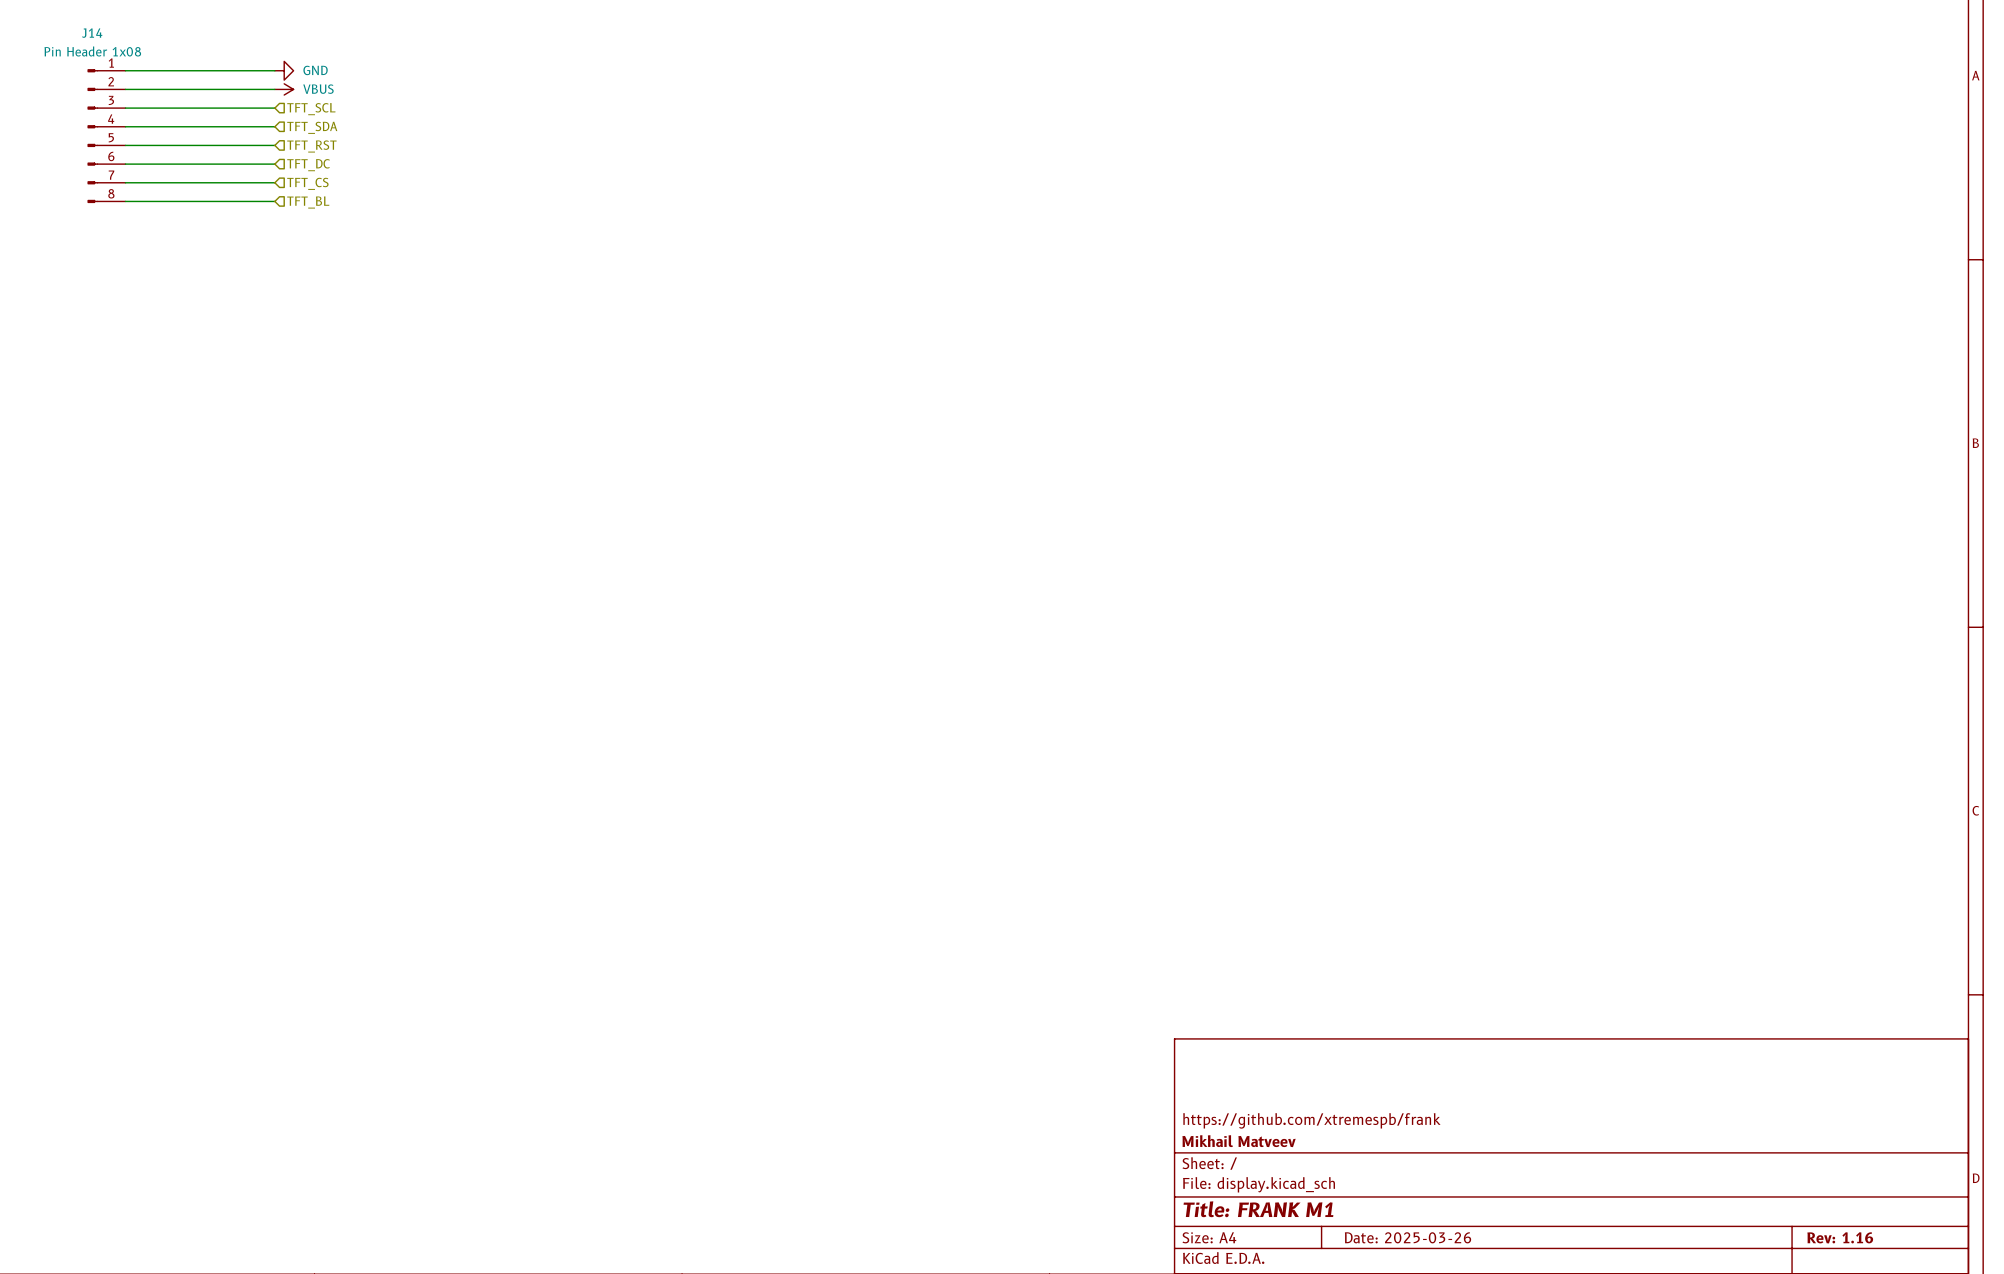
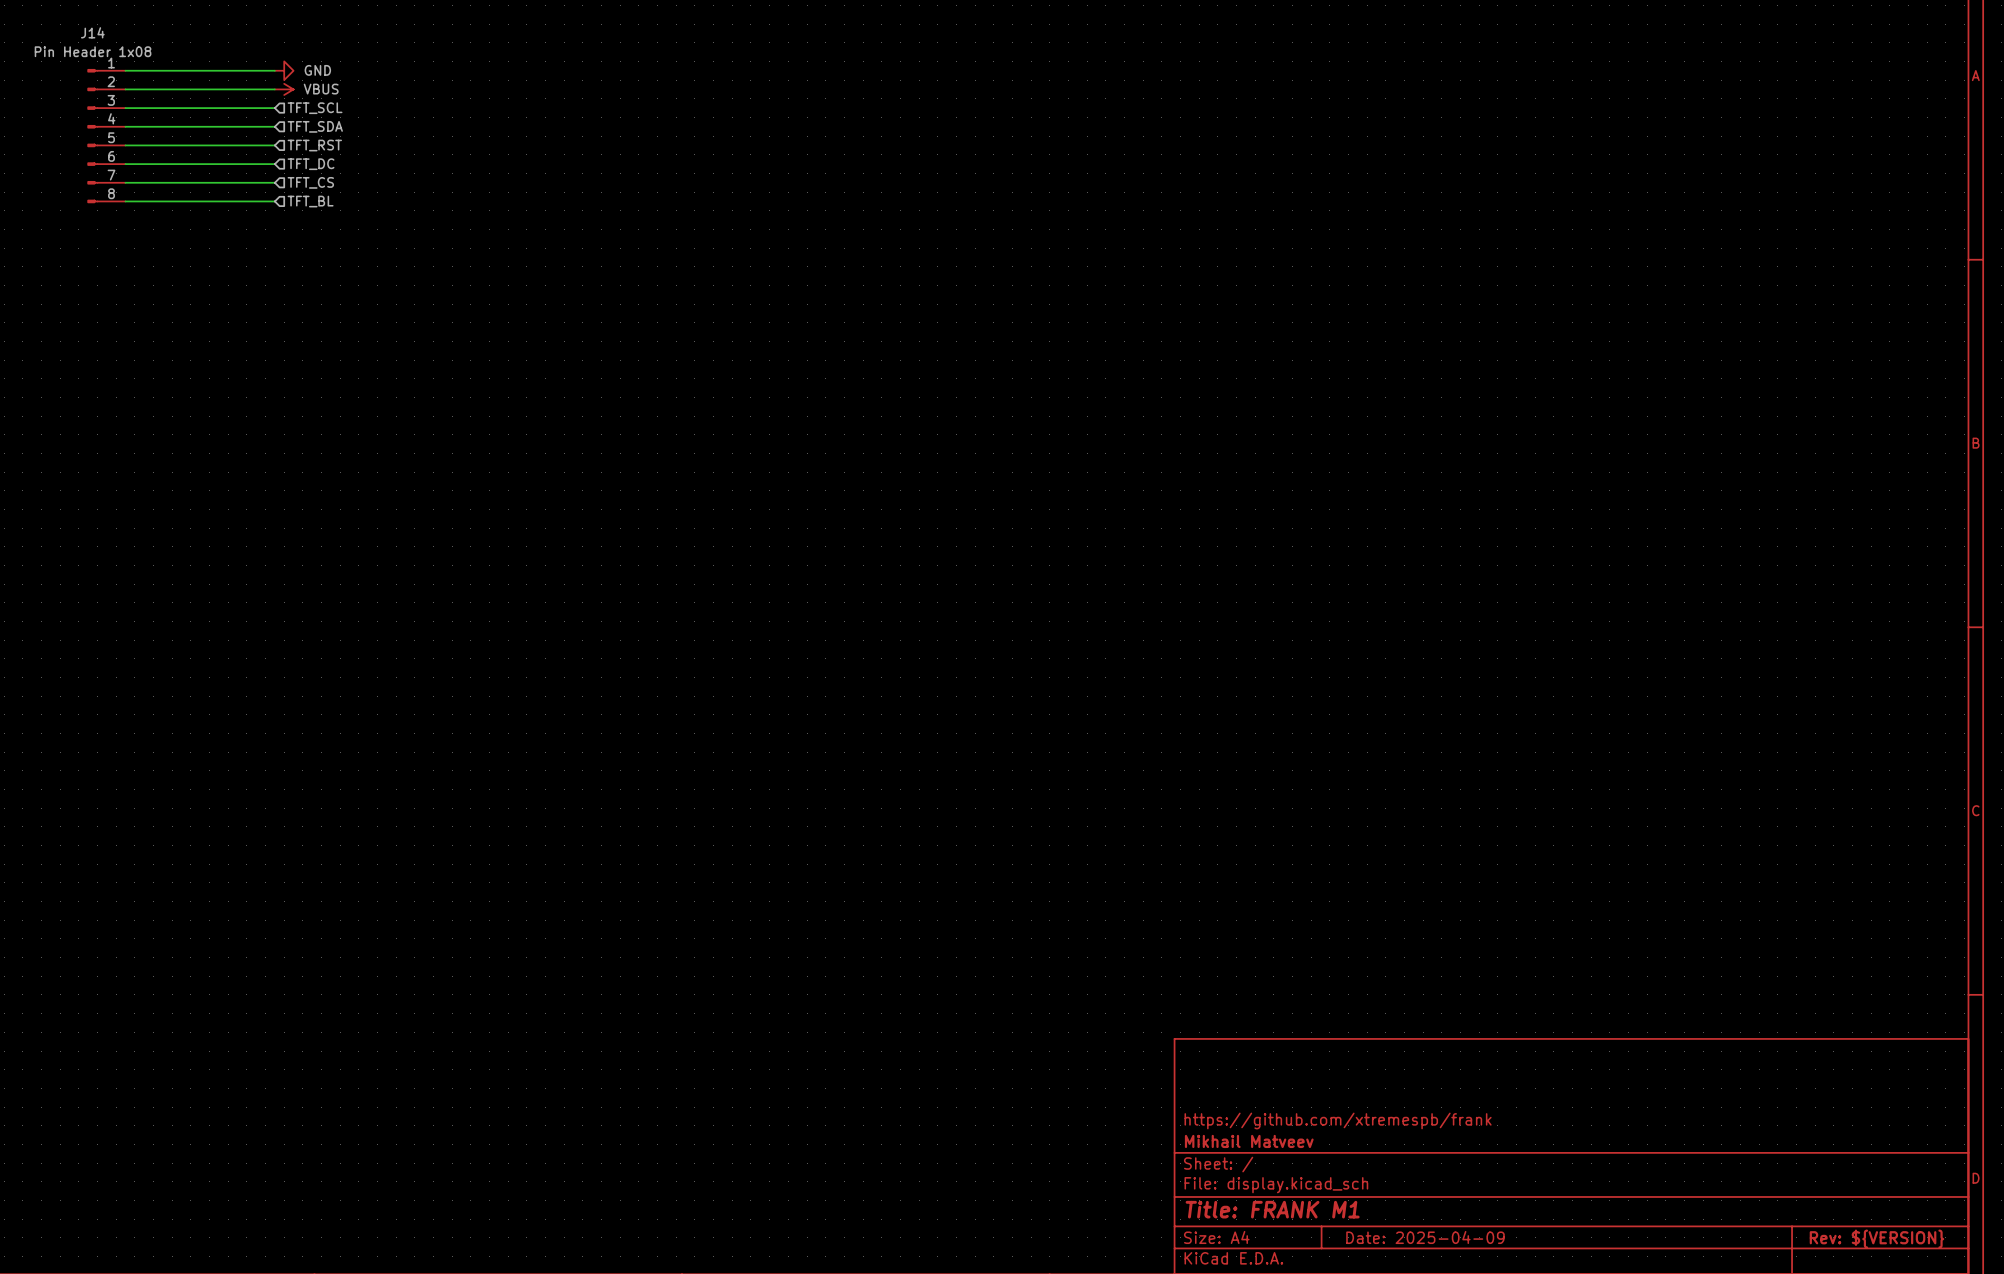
title block: Date: 2025-03-26 (1408, 1237) -> Date: 2025-04-09 (1425, 1237)
title block: Rev: 1.16 (1840, 1237) -> Rev: ${VERSION} (1876, 1239)

